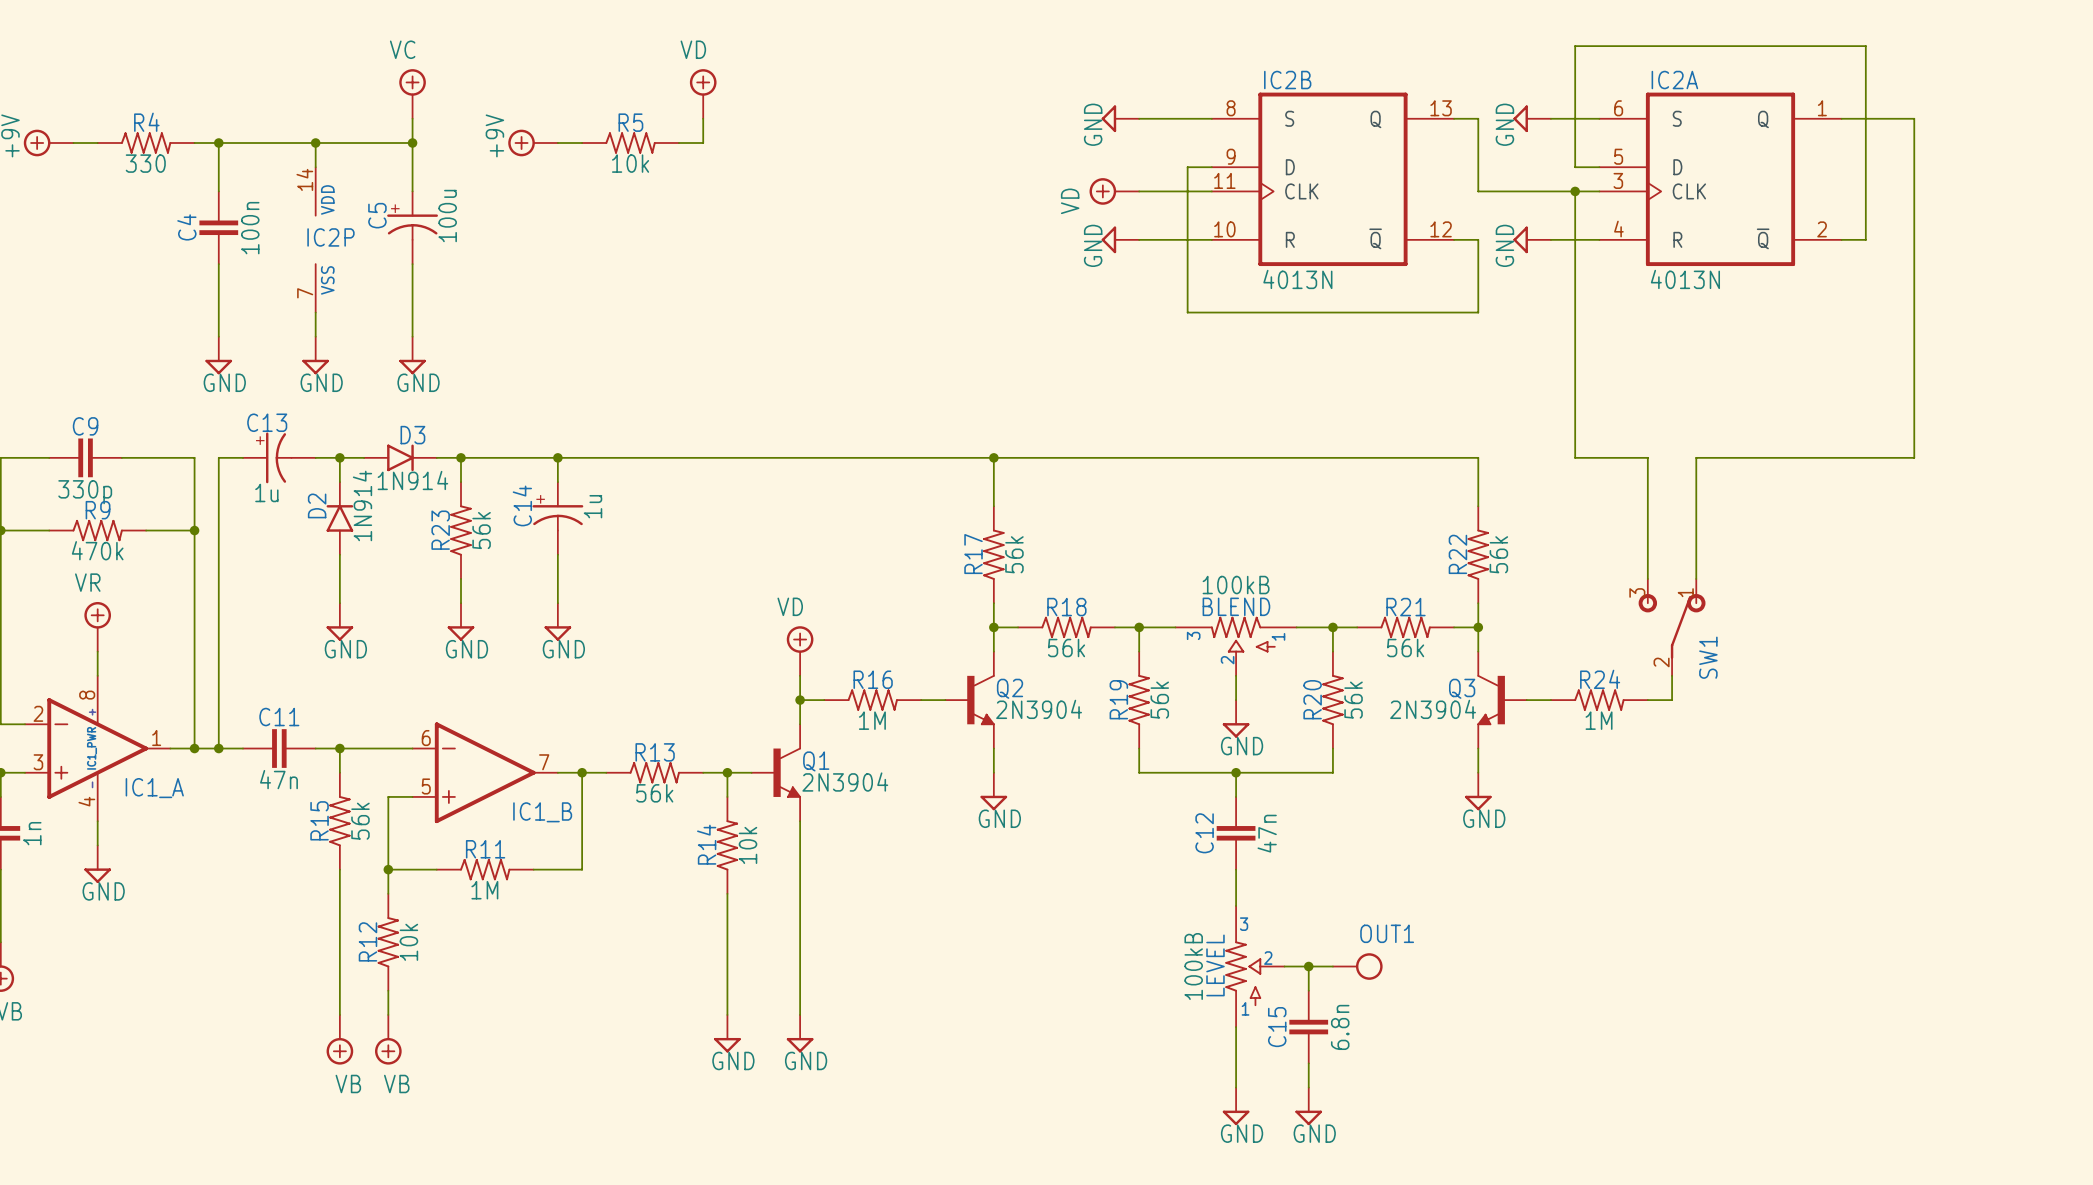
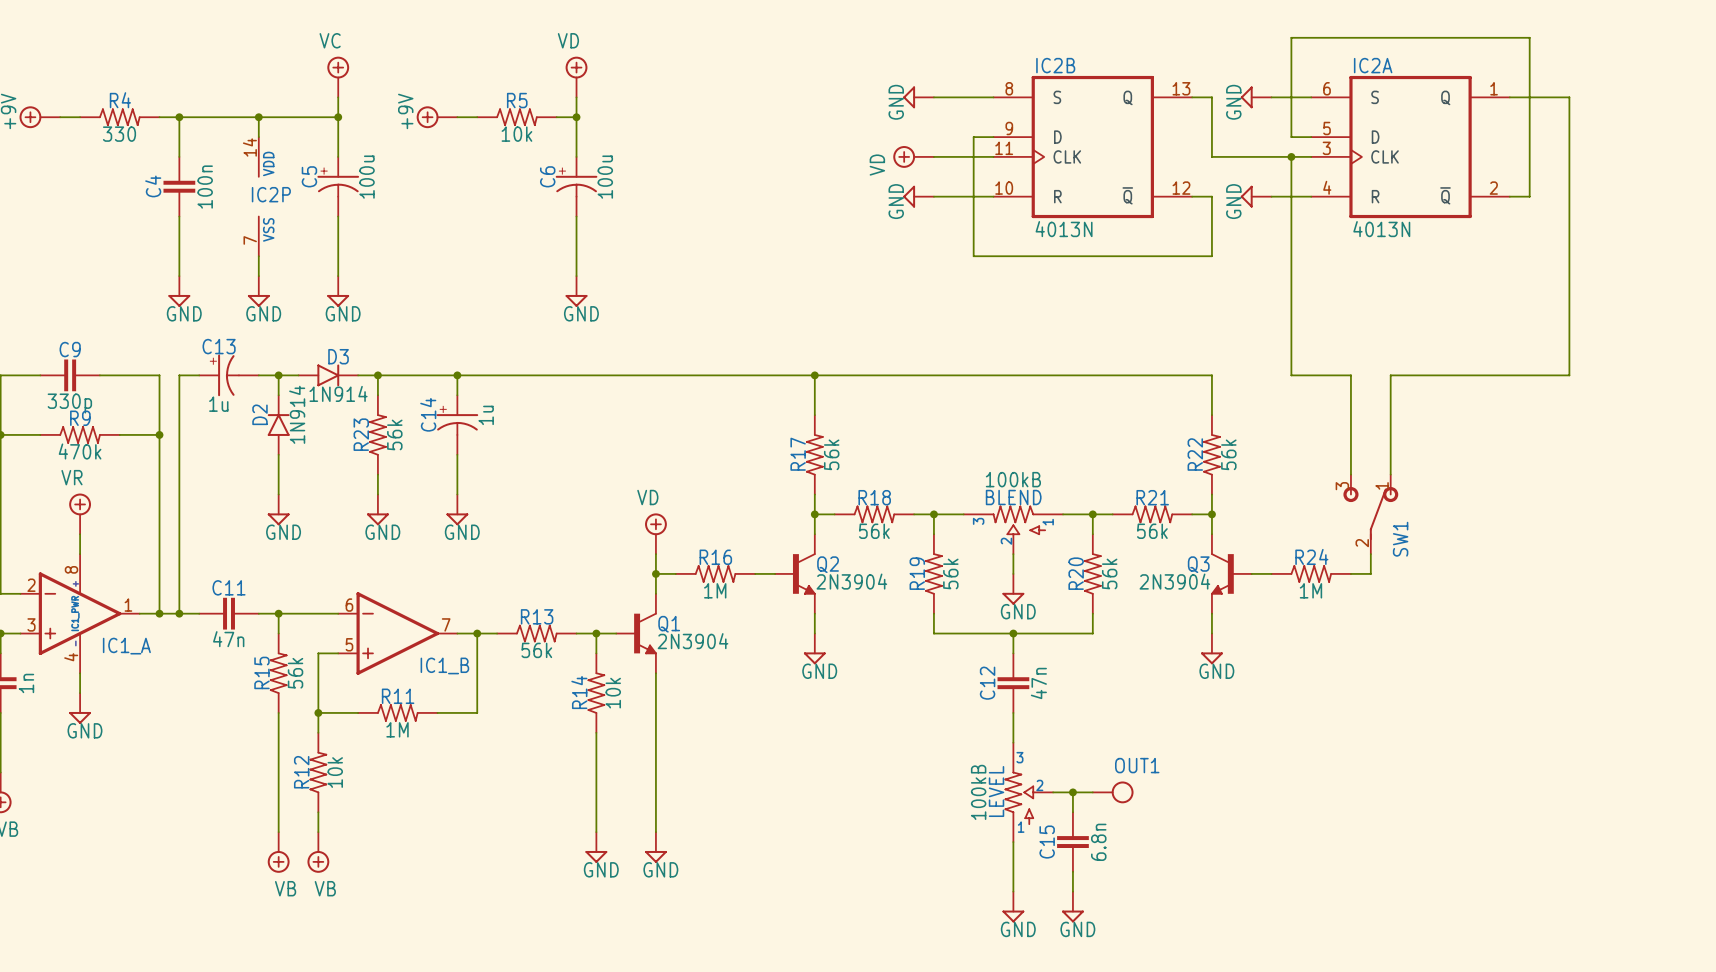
wire: none -> (576, 117) (576, 156)
junction: none -> (576, 117)
C6: none -> 100u (576, 186)
wire: none -> (576, 216) (576, 276)
power symbol: none -> GND (576, 291)

